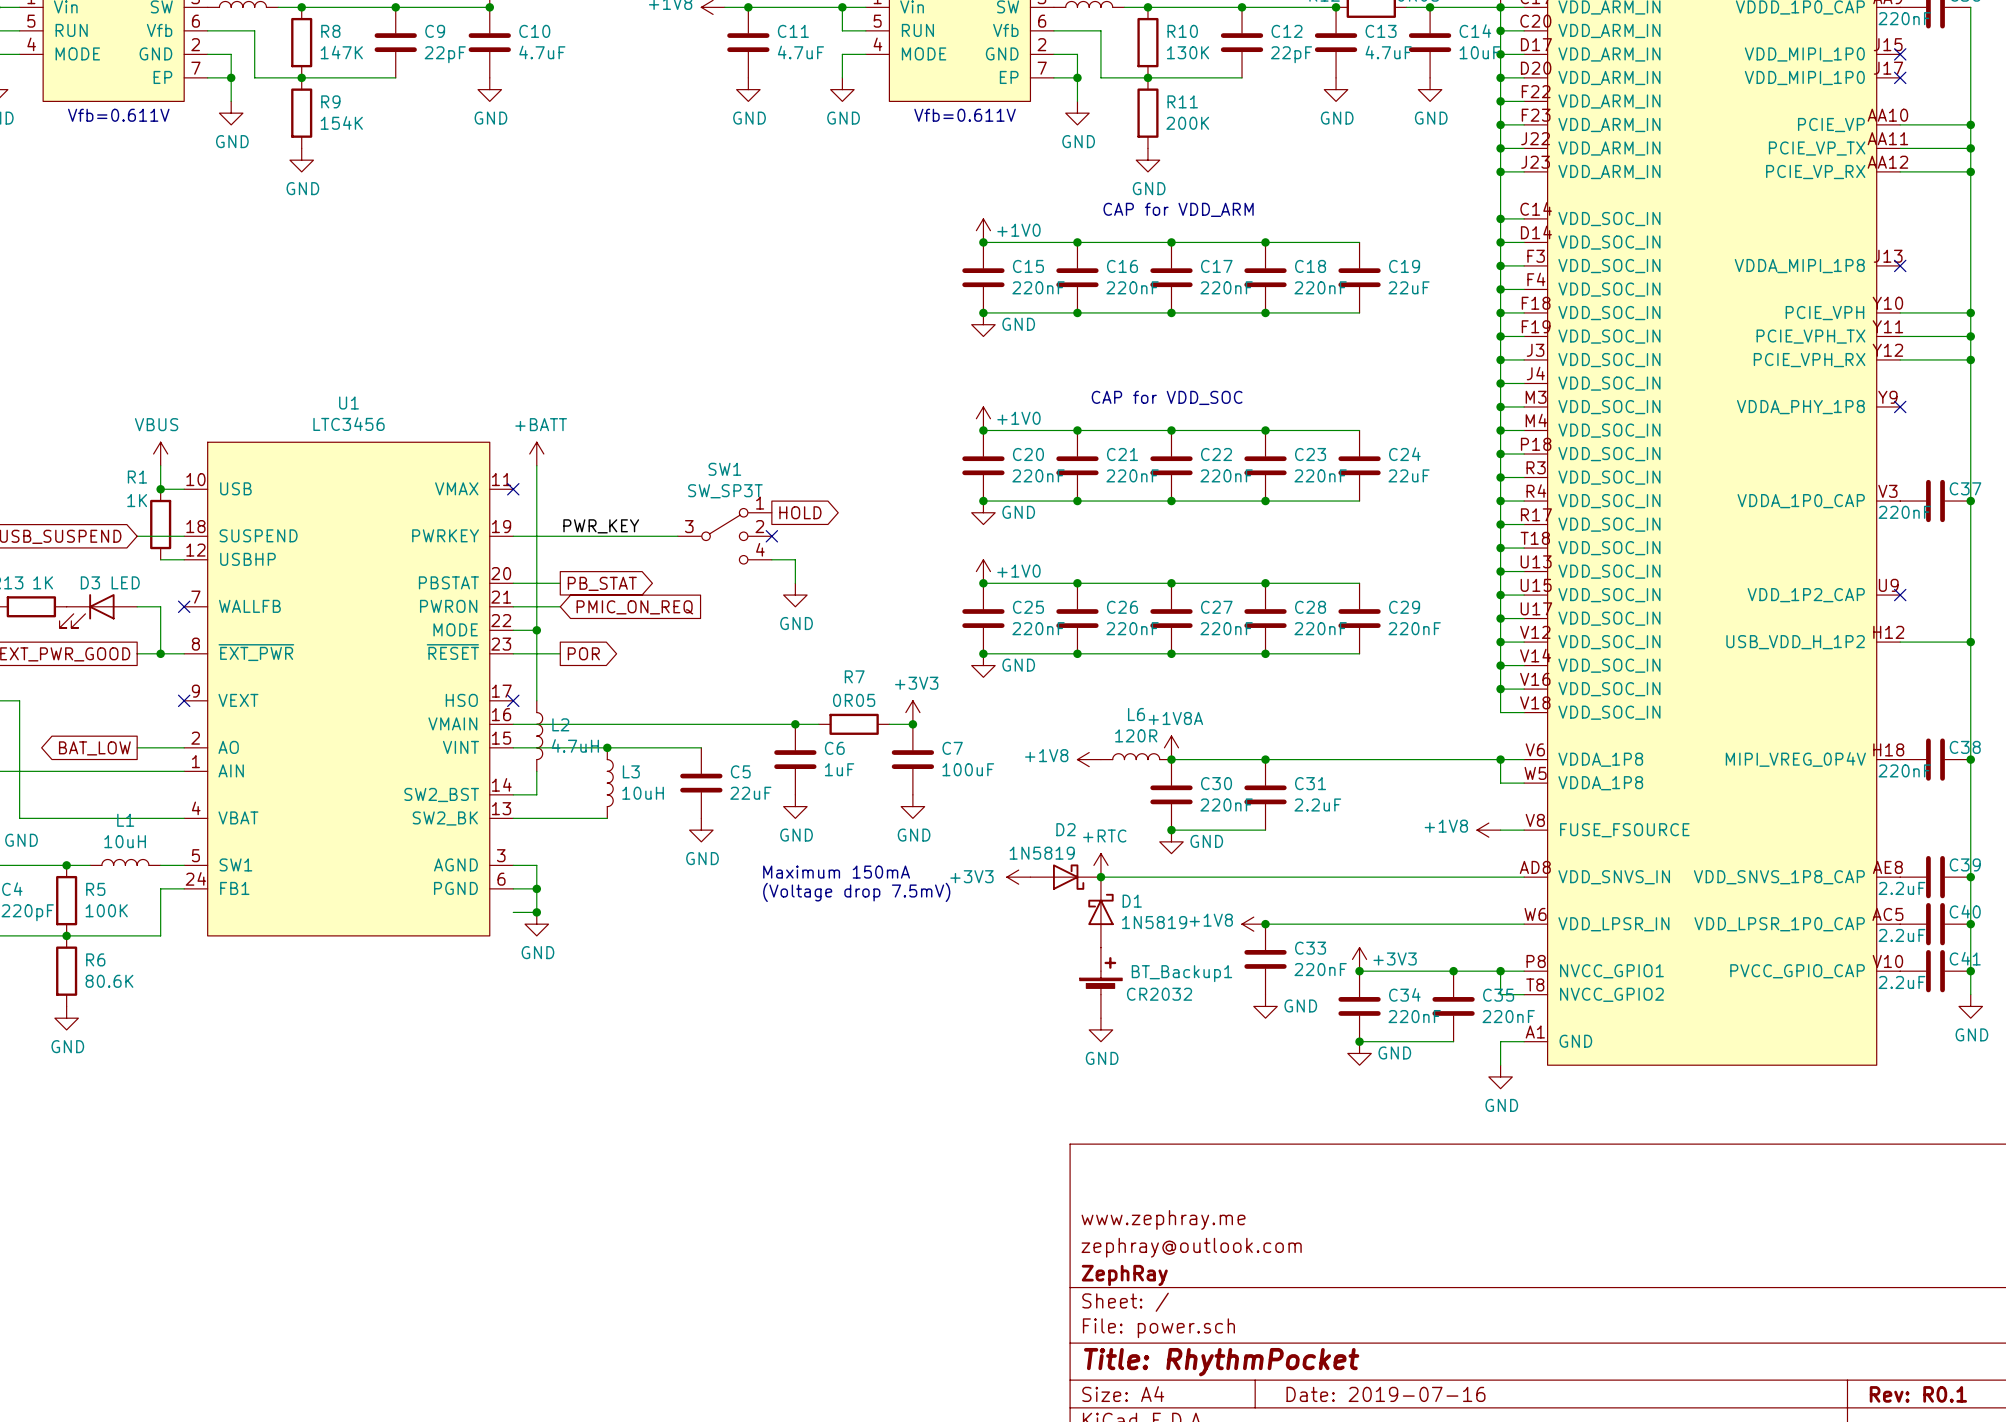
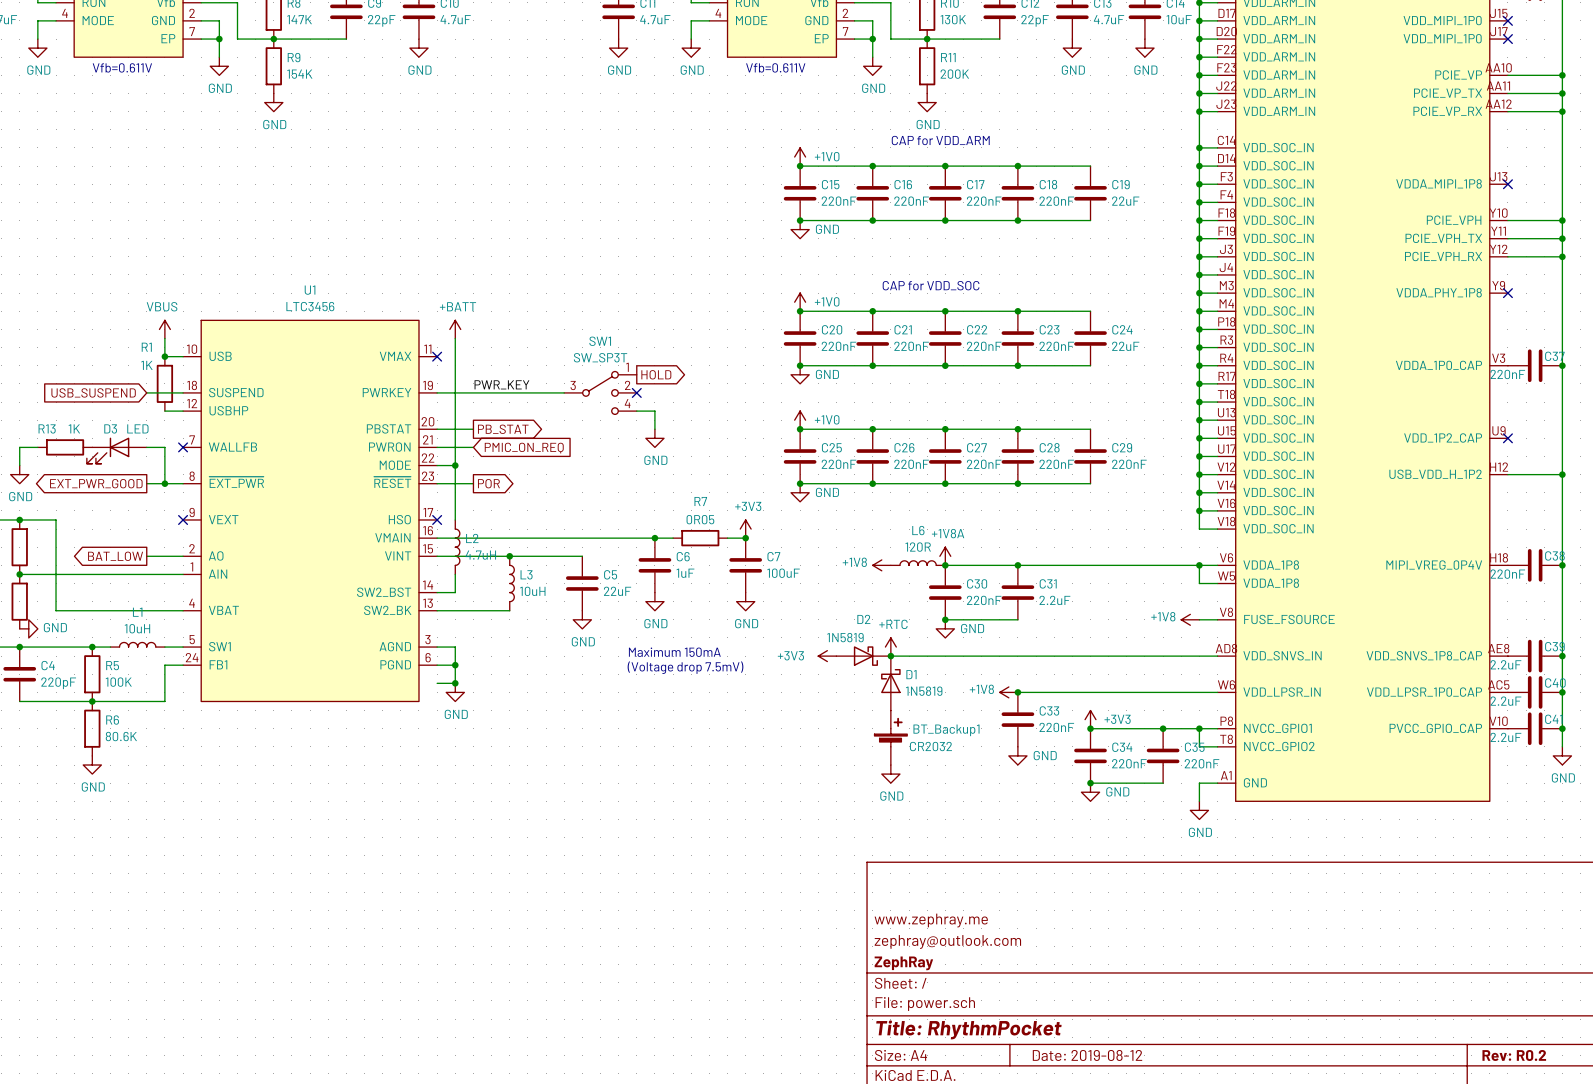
title block: Date: 2019-07-16 (1386, 1394) -> Date: 2019-08-12 (1087, 1055)
title block: Rev: R0.1 (1918, 1394) -> Rev: R0.2 (1514, 1055)

